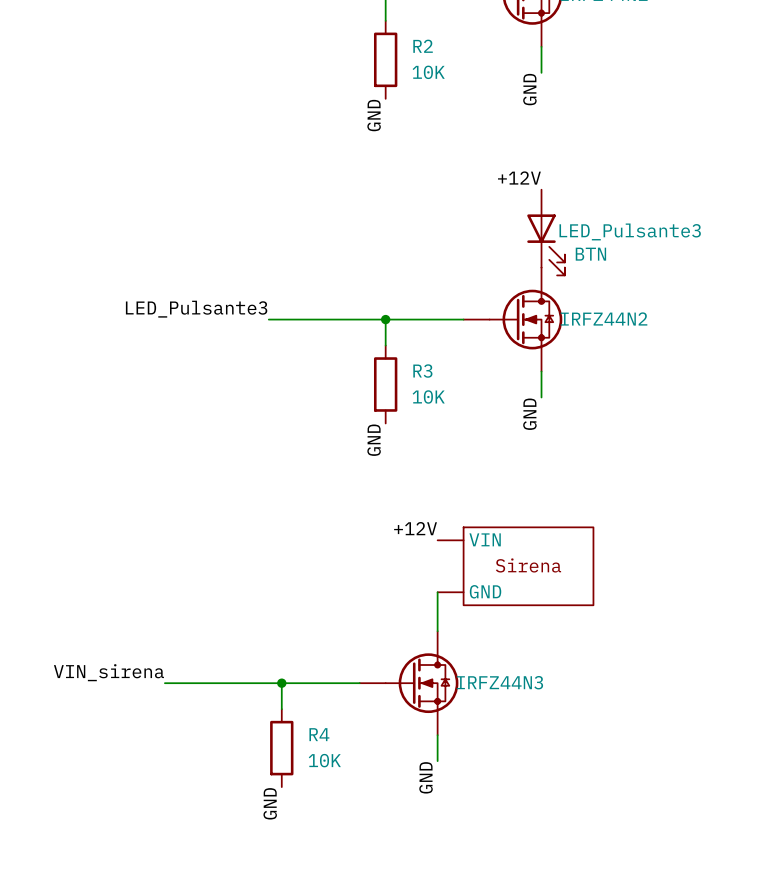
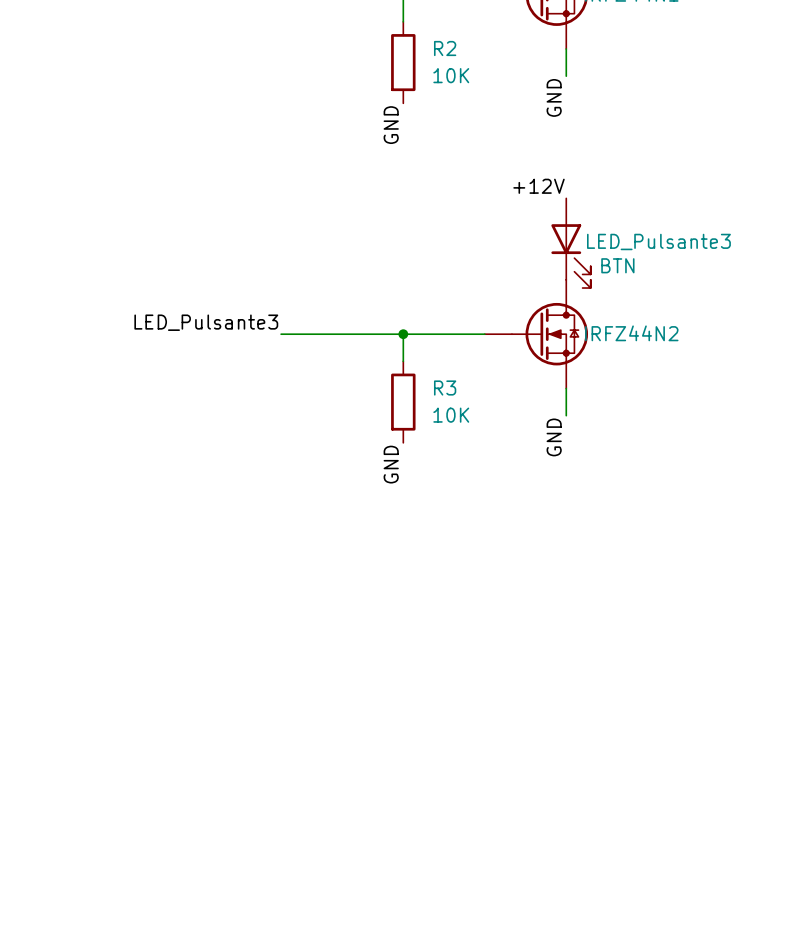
label: +12V (415, 528) -> none
part: (515, 566) -> none
wire: (437, 592) (437, 631) -> none
label: VIN_sirena (108, 672) -> none
wire: (164, 683) (359, 683) -> none
wire: (281, 683) (281, 709) -> none
junction: (281, 683) -> none
IRFZ44N3: (409, 683) -> none
wire: (437, 735) (437, 761) -> none
R4: 10K (281, 748) -> none
label: GND (426, 777) -> none
label: GND (270, 803) -> none

